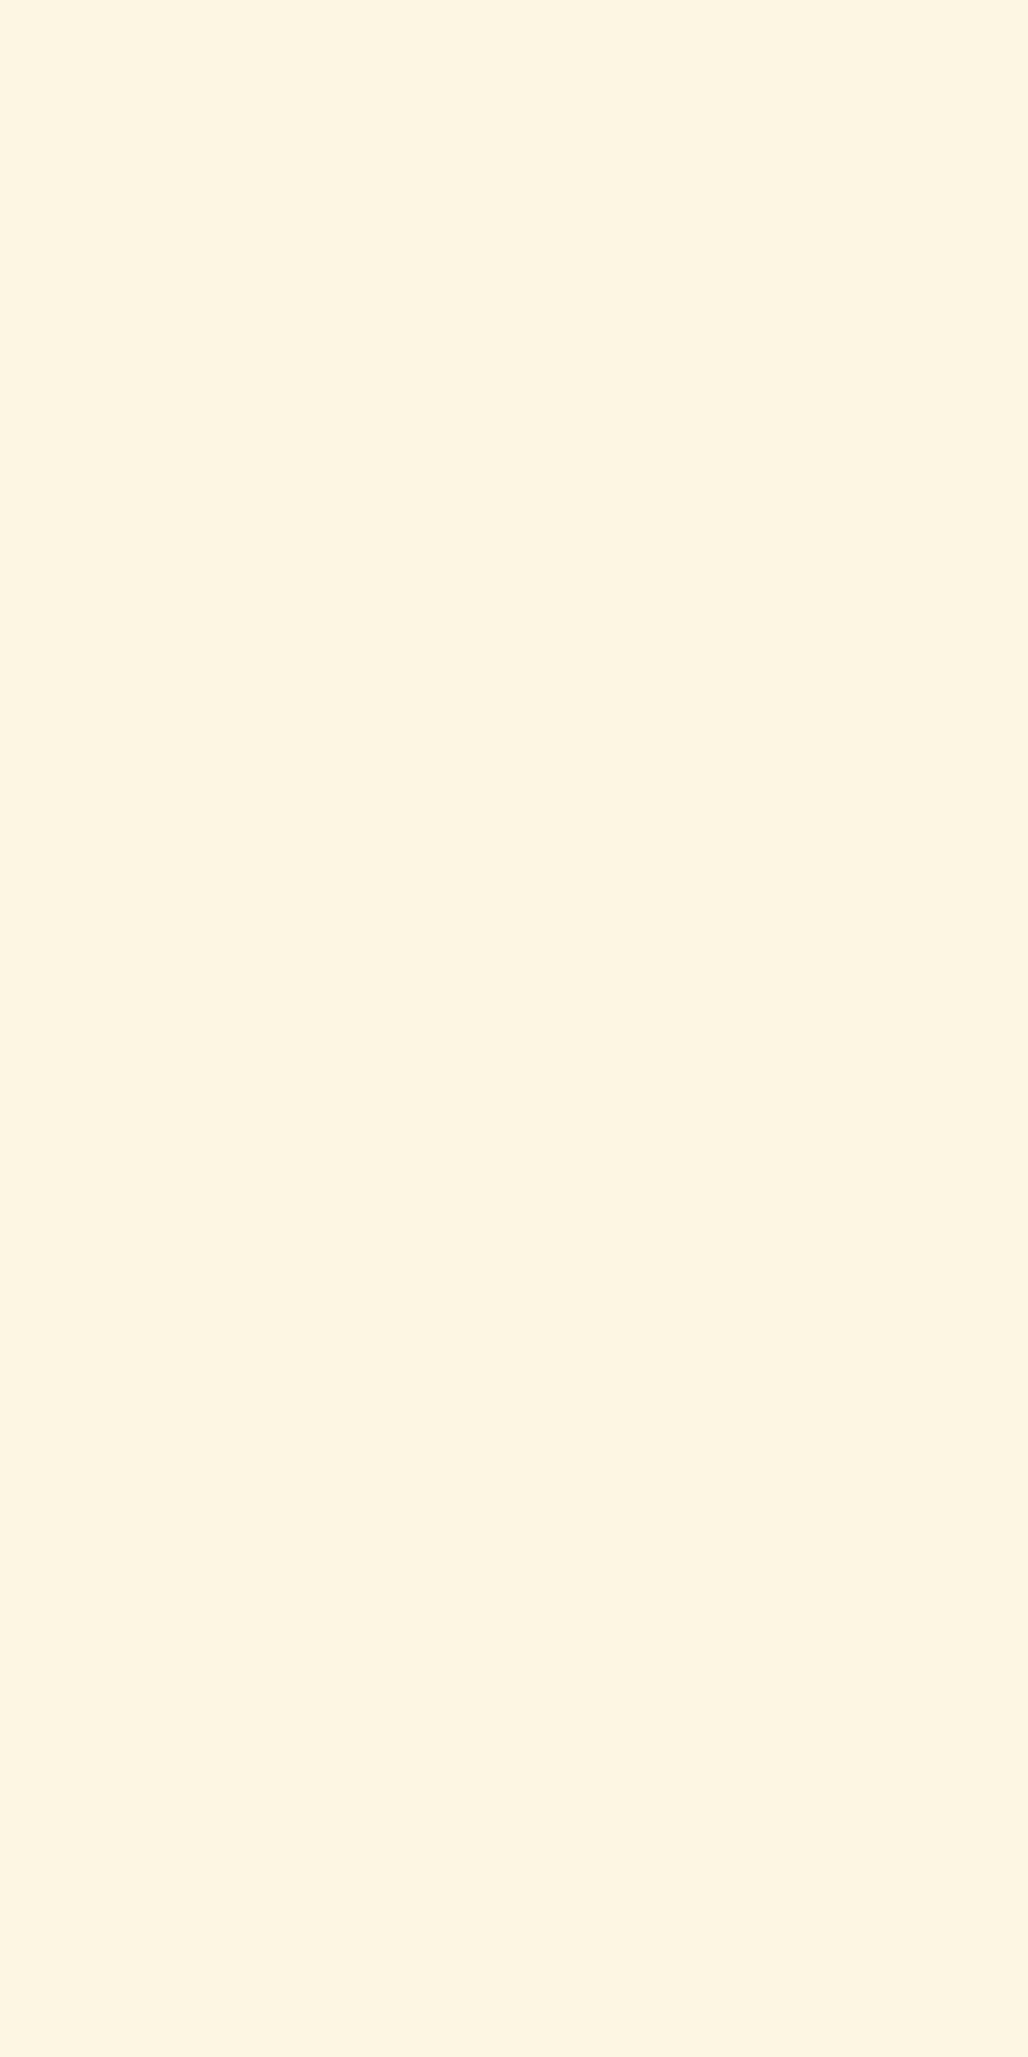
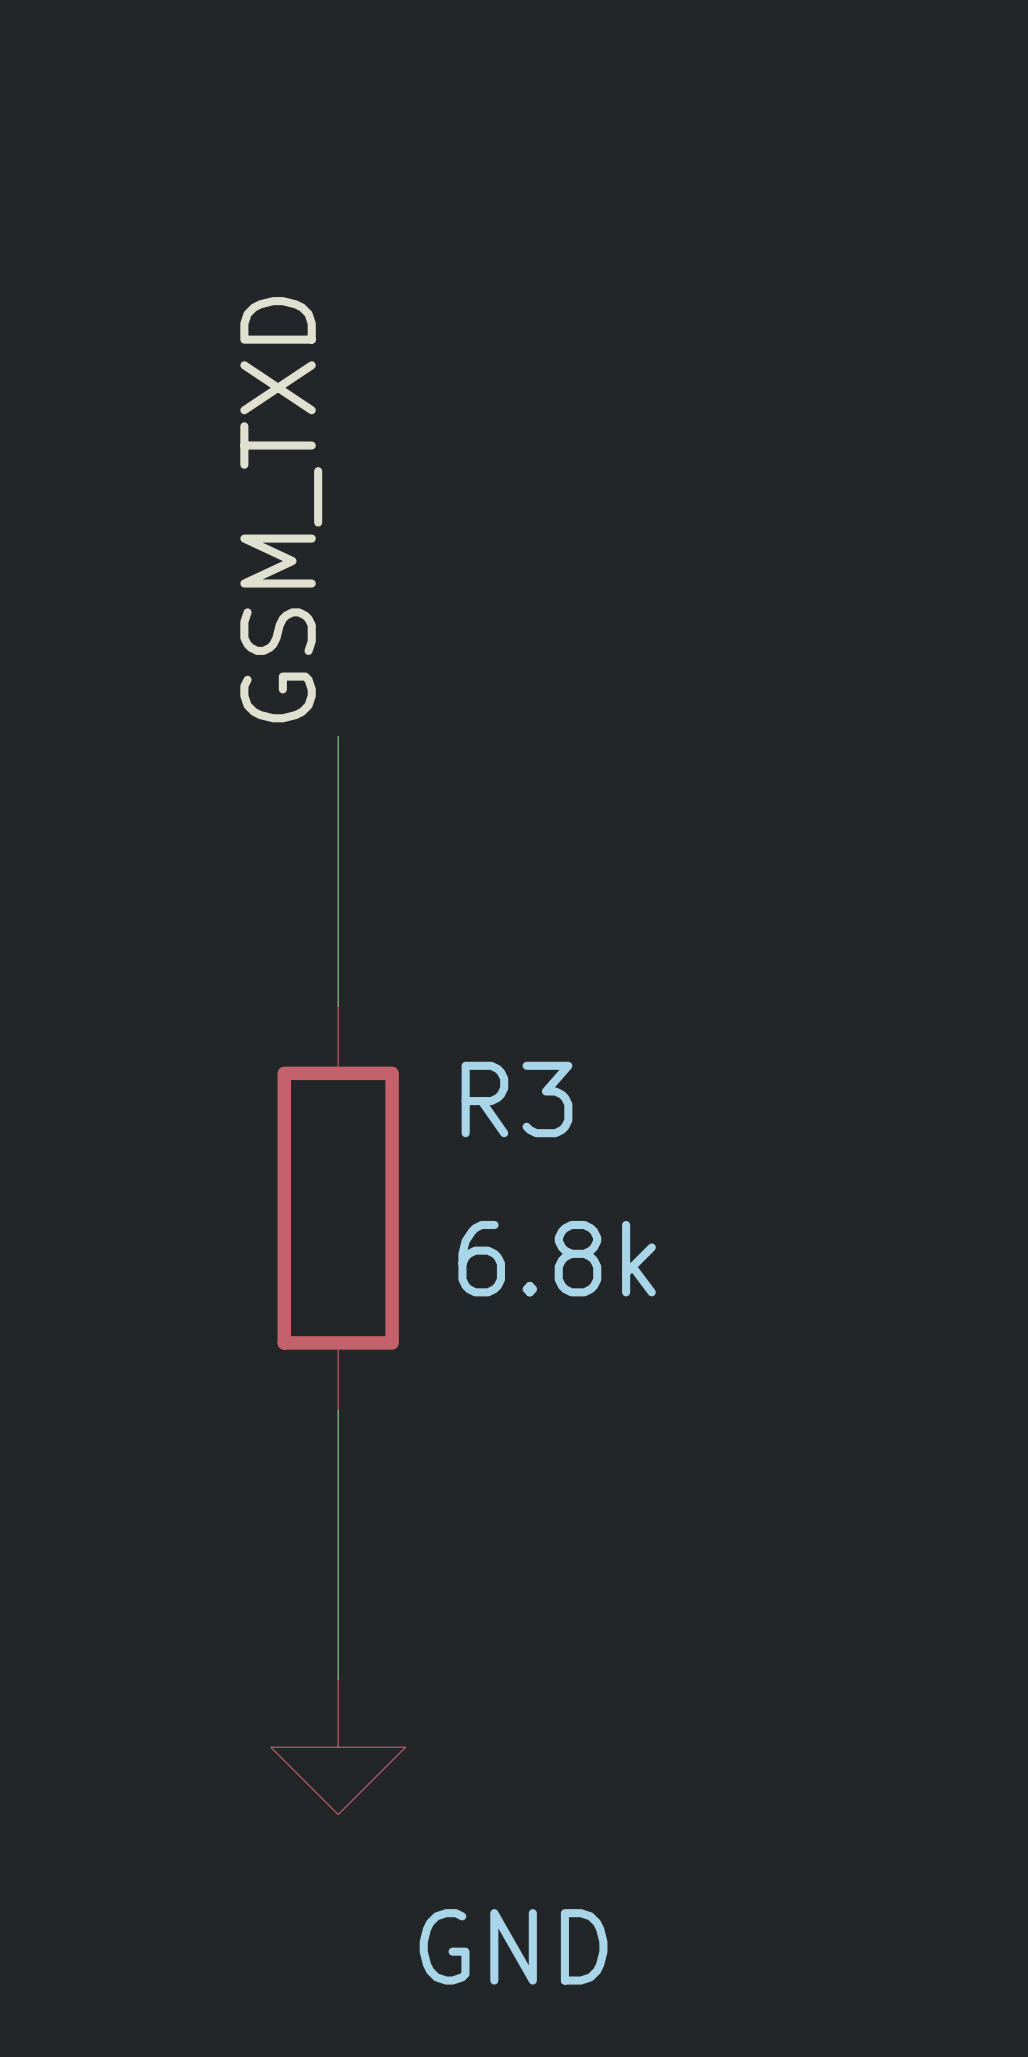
label: none -> GSM_TXD (281, 509)
wire: none -> (338, 736) (338, 1005)
R3: none -> 6.8k (338, 1208)
wire: none -> (338, 1410) (338, 1679)
power symbol: none -> GND (338, 1747)

